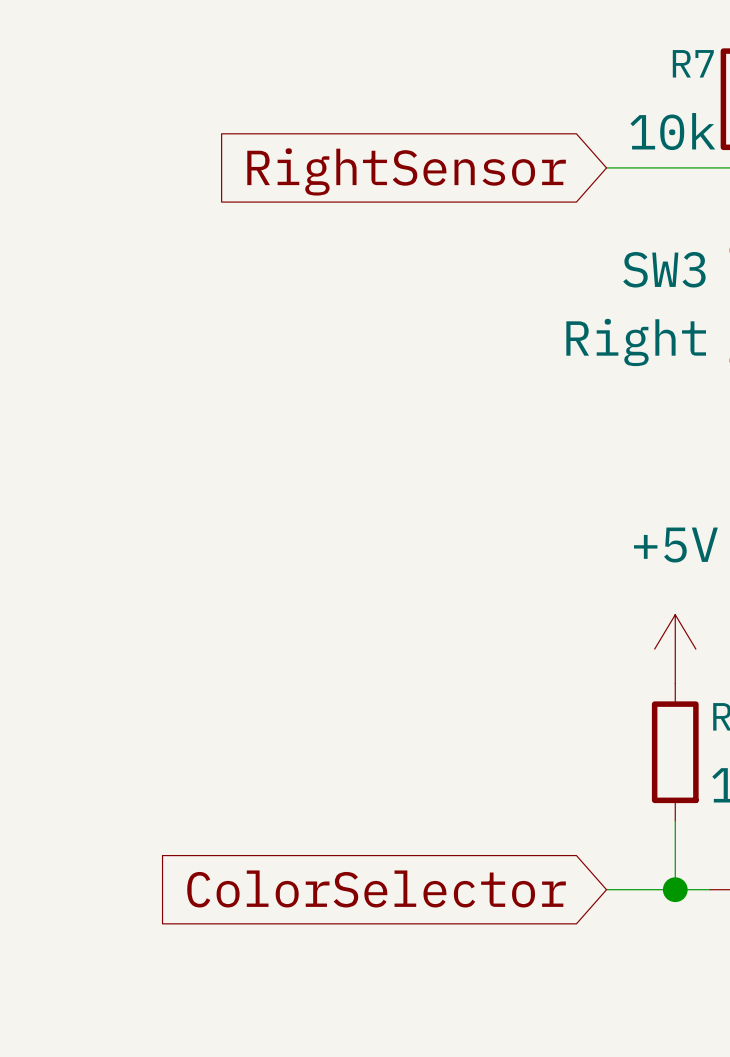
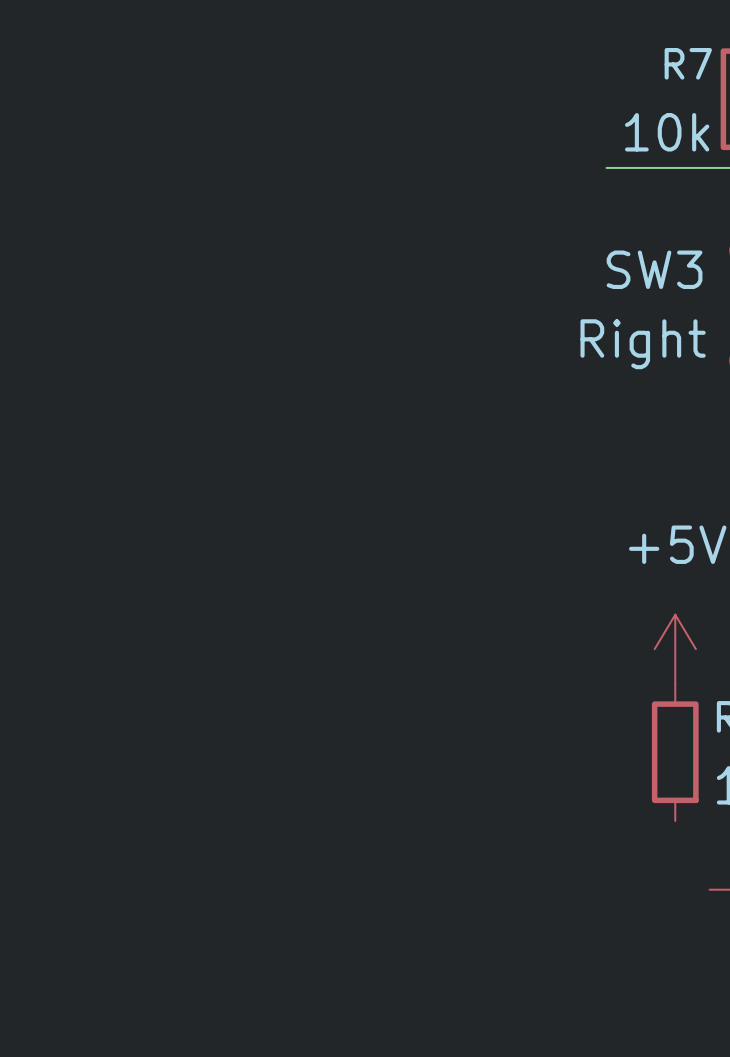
global label: RightSensor (406, 171) -> none
wire: (675, 820) (675, 889) -> none
global label: ColorSelector (376, 888) -> none
wire: (606, 889) (709, 889) -> none
junction: (675, 889) -> none

